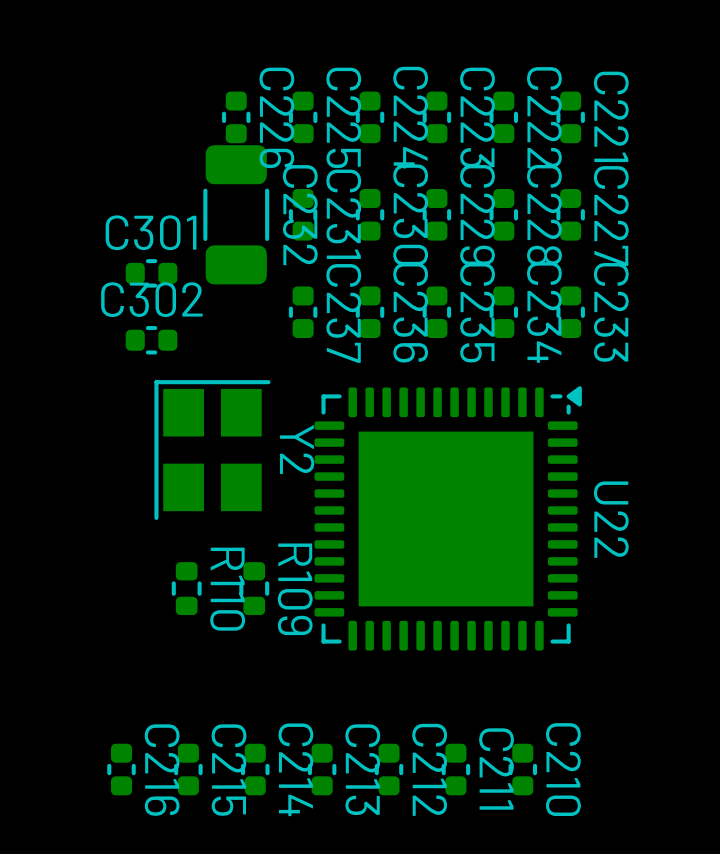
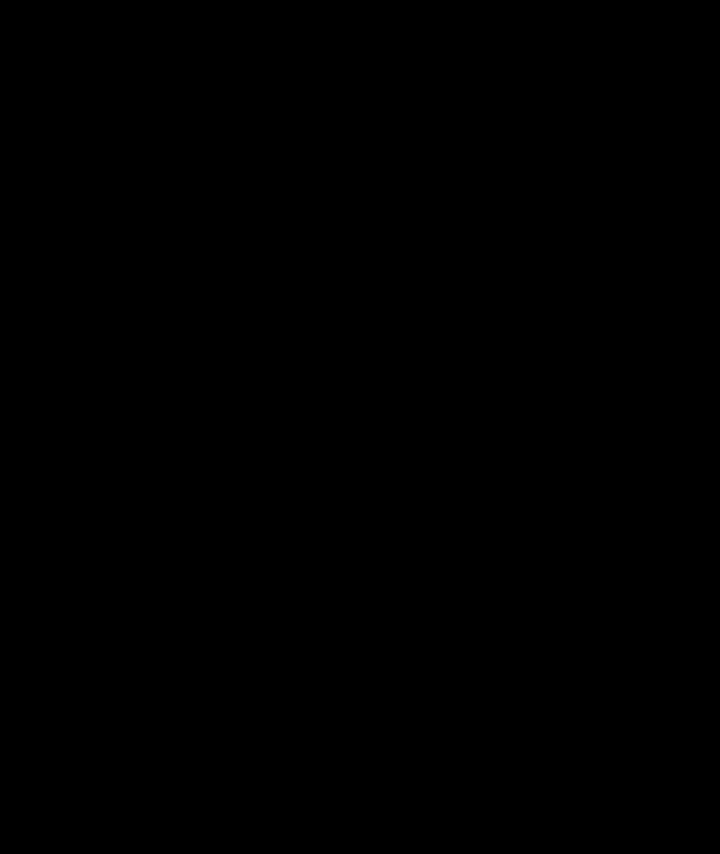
C226: (236, 117) -> none
C225: (303, 117) -> none
C224: (370, 117) -> none
C223: (436, 117) -> none
C222: (503, 117) -> none
C221: (570, 117) -> none
C232: (236, 214) -> none
C231: (303, 214) -> none
C230: (370, 214) -> none
C229: (436, 214) -> none
C228: (503, 214) -> none
C227: (570, 214) -> none
C301: (151, 273) -> none
C237: (303, 312) -> none
C236: (370, 312) -> none
C235: (436, 312) -> none
C234: (503, 312) -> none
C233: (570, 312) -> none
C302: (151, 340) -> none
Y2: (212, 450) -> none
U22: (448, 518) -> none
R110: (186, 588) -> none
R109: (254, 588) -> none
C216: (121, 769) -> none
C215: (188, 769) -> none
C214: (255, 769) -> none
C213: (322, 769) -> none
C212: (389, 769) -> none
C211: (455, 769) -> none
C210: (522, 769) -> none

